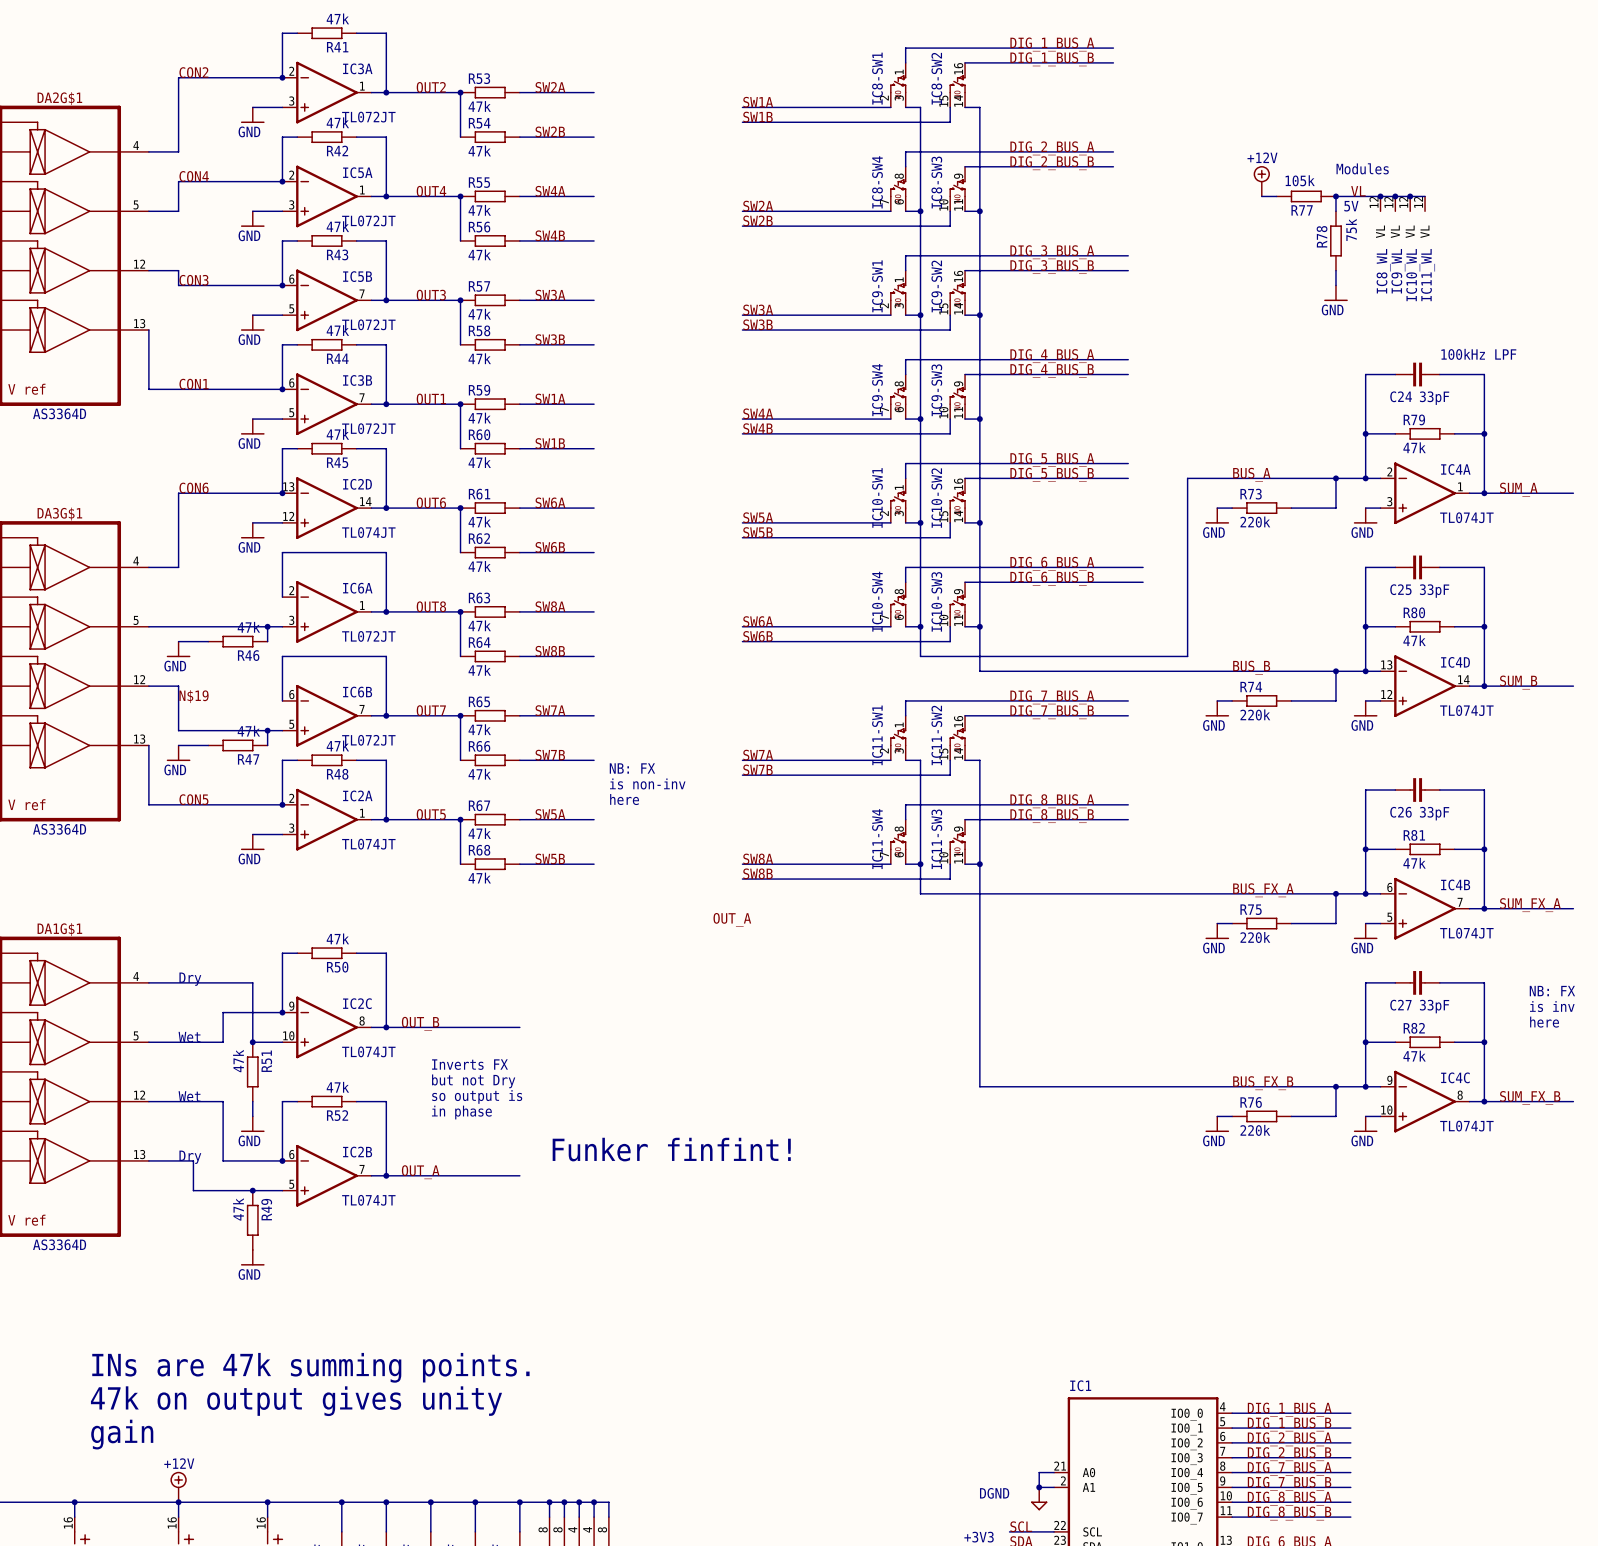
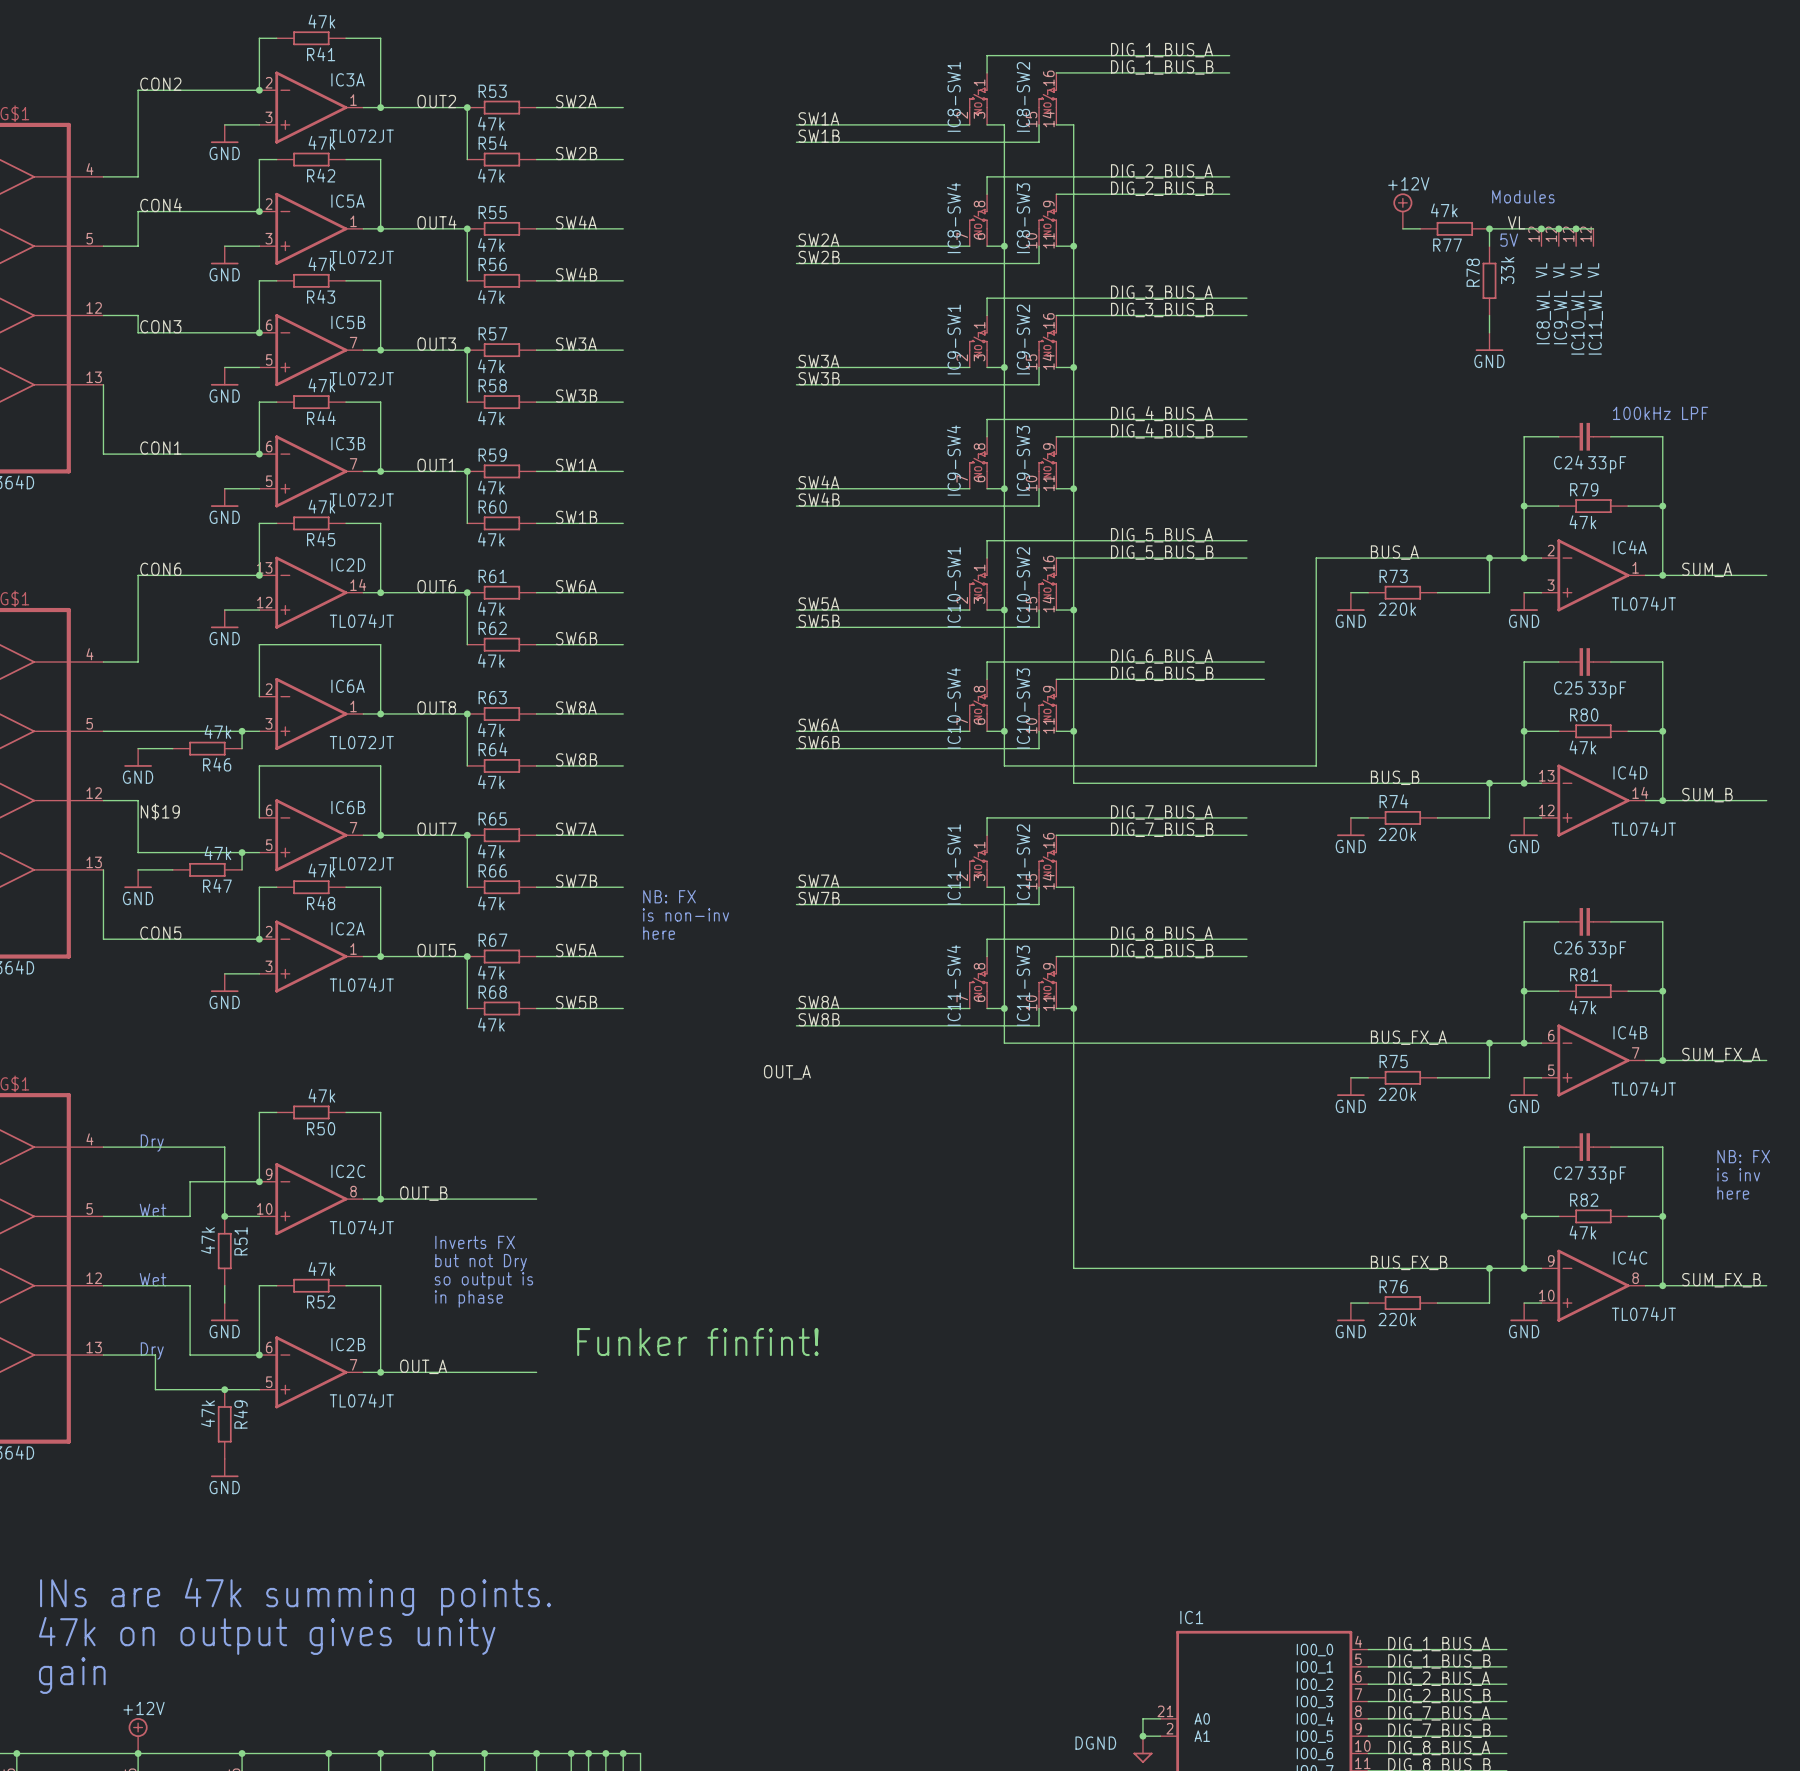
R77 value: 105k (1300, 180) -> 47k (1444, 210)
R78 value: 75k (1351, 229) -> 33k (1507, 270)

